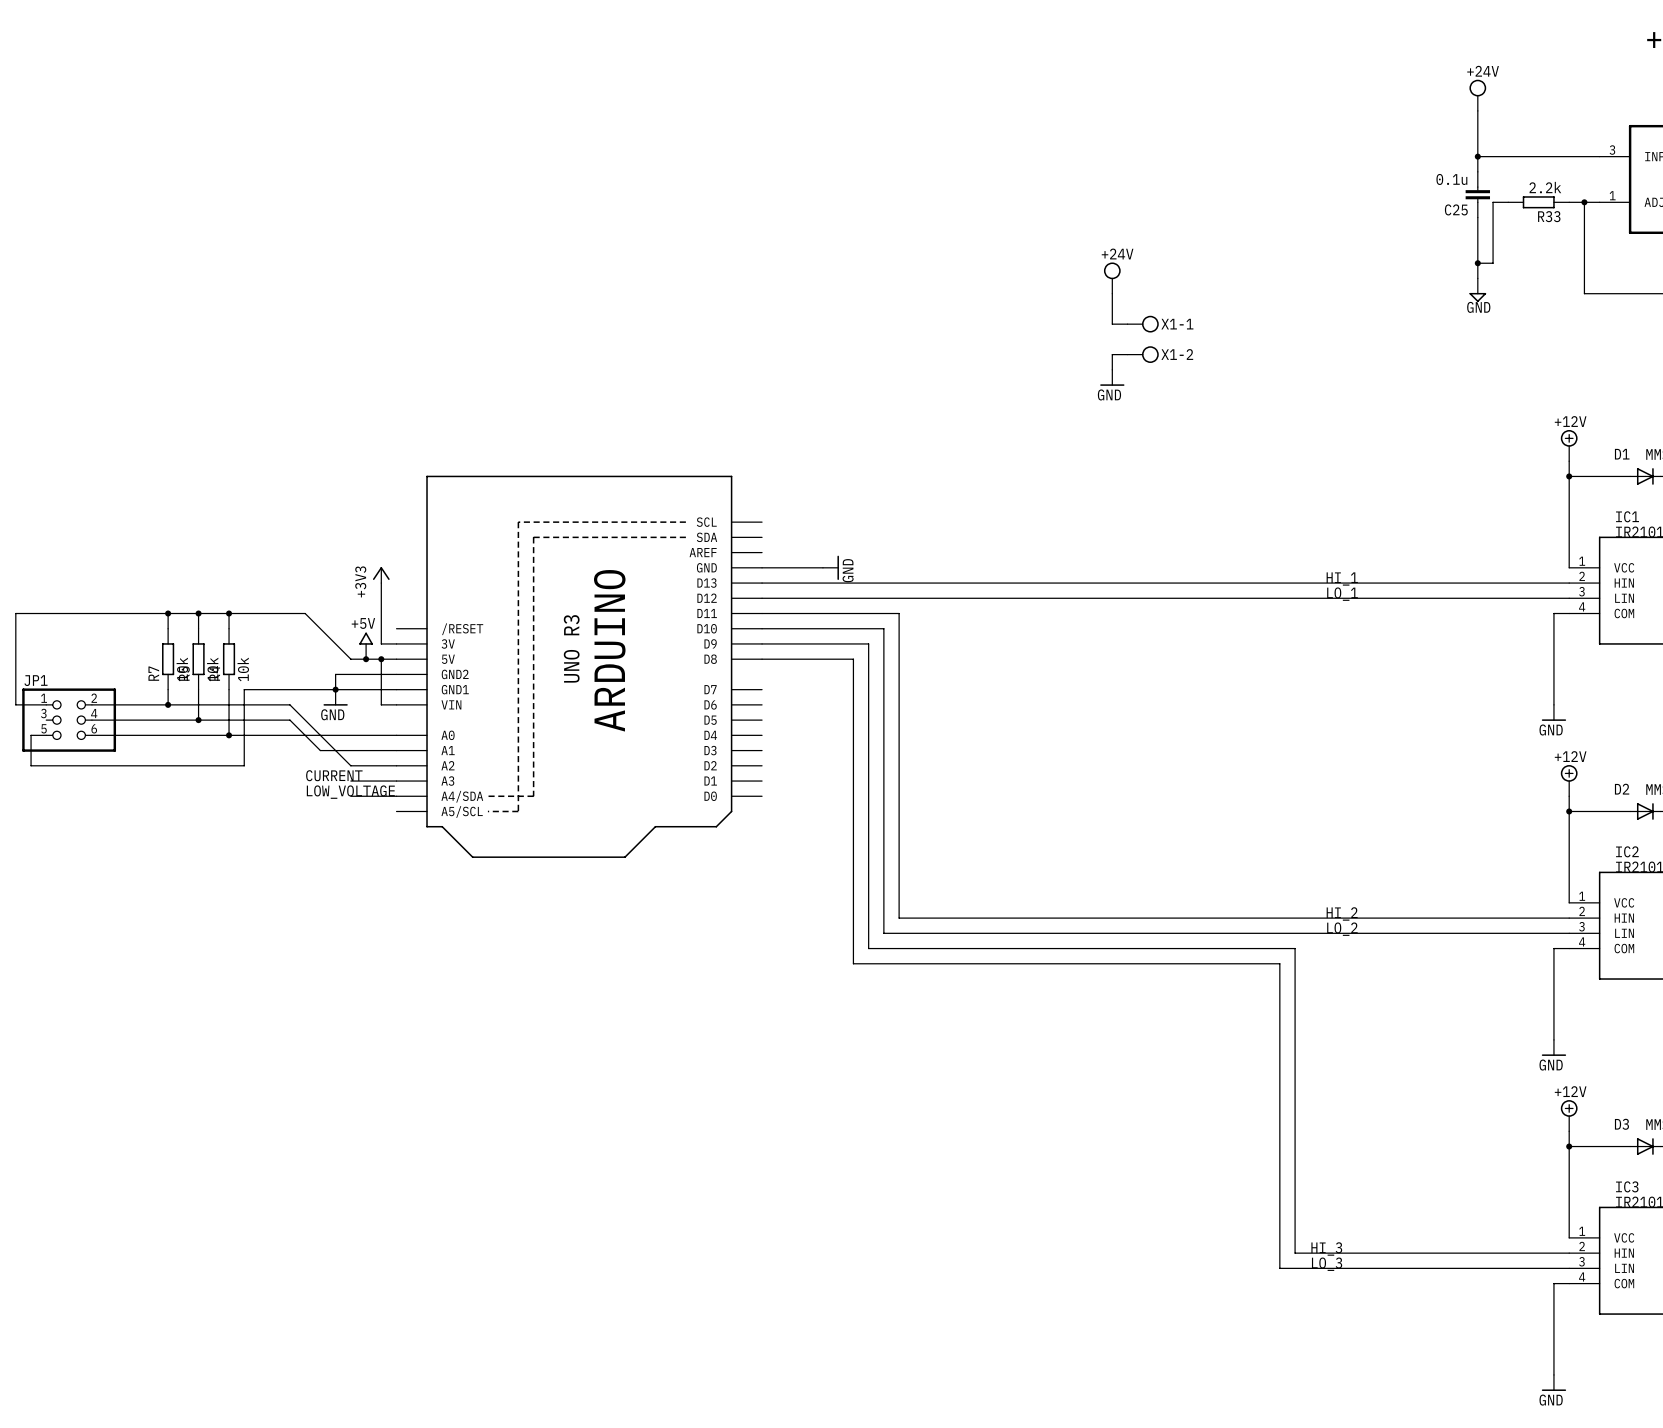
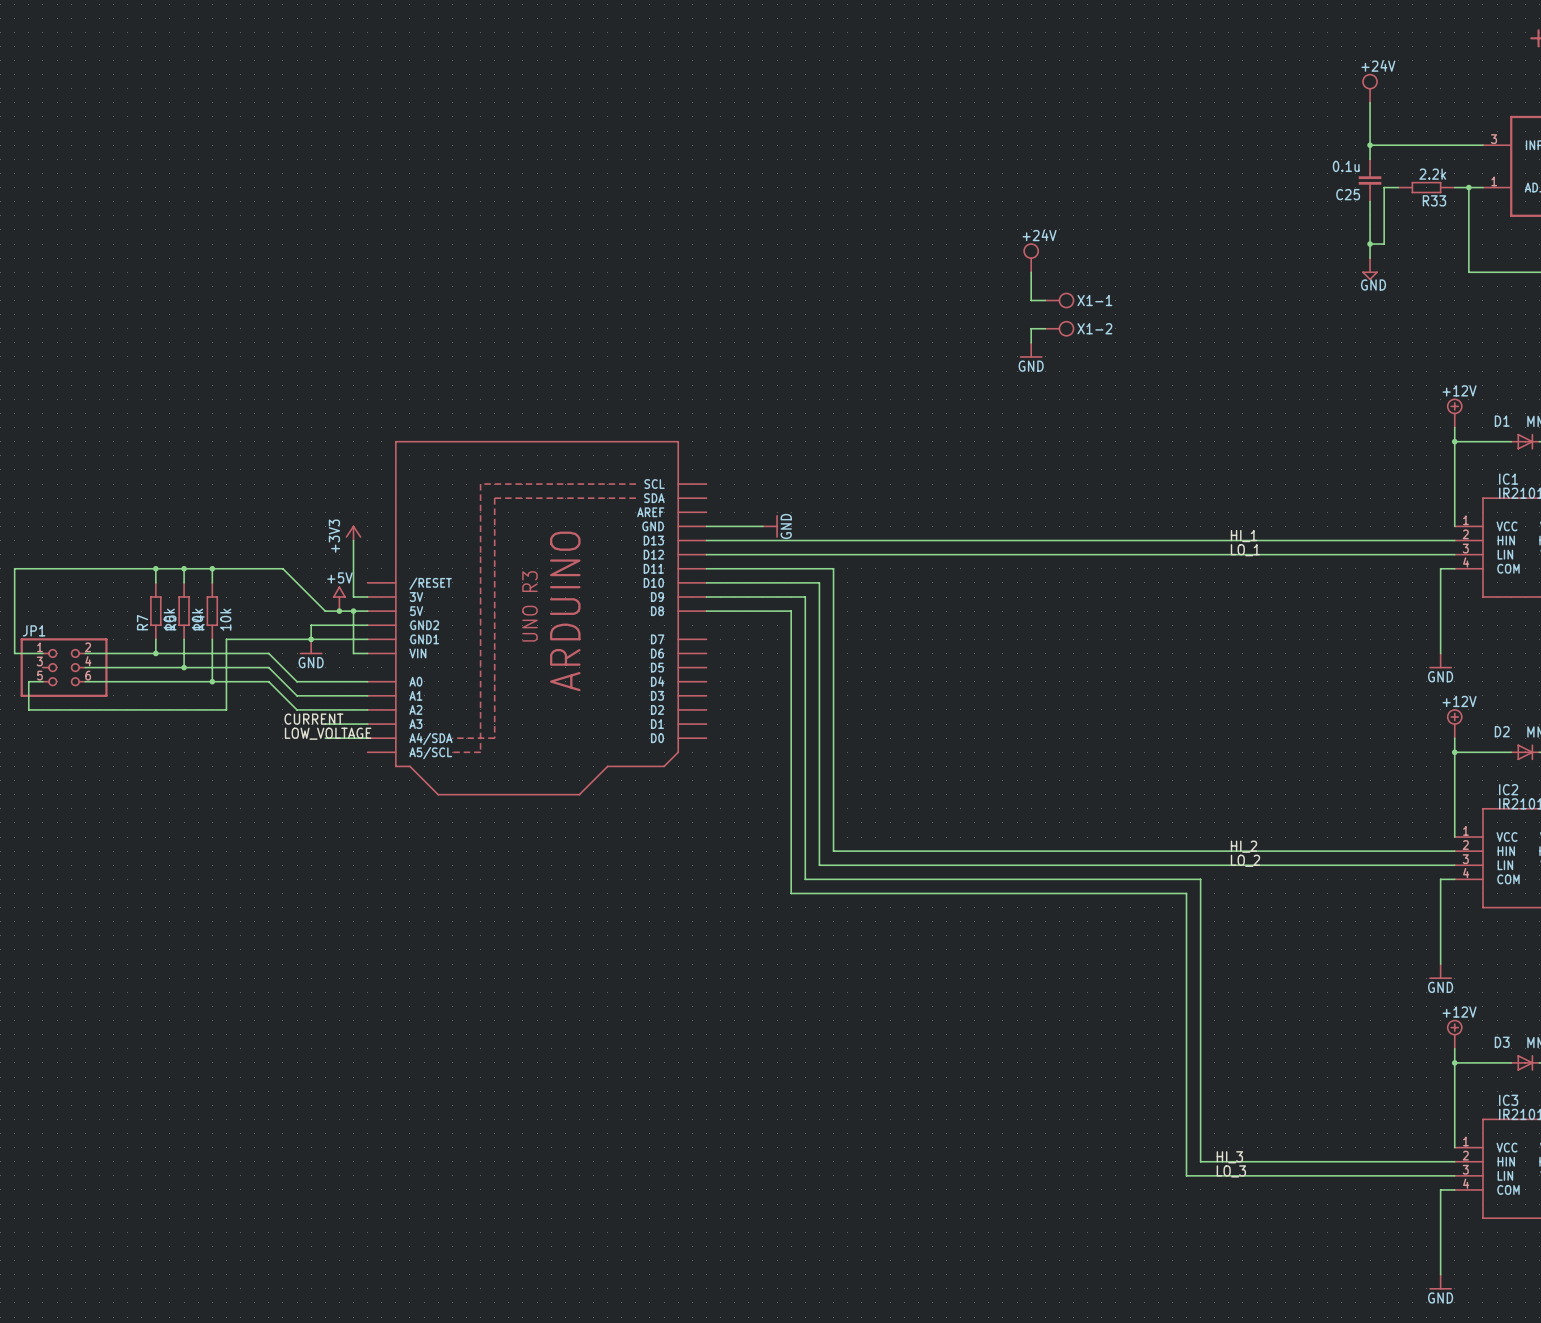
wire: (289, 735) (320, 735) (350, 765) -> (268, 681) (297, 709) (325, 709)

